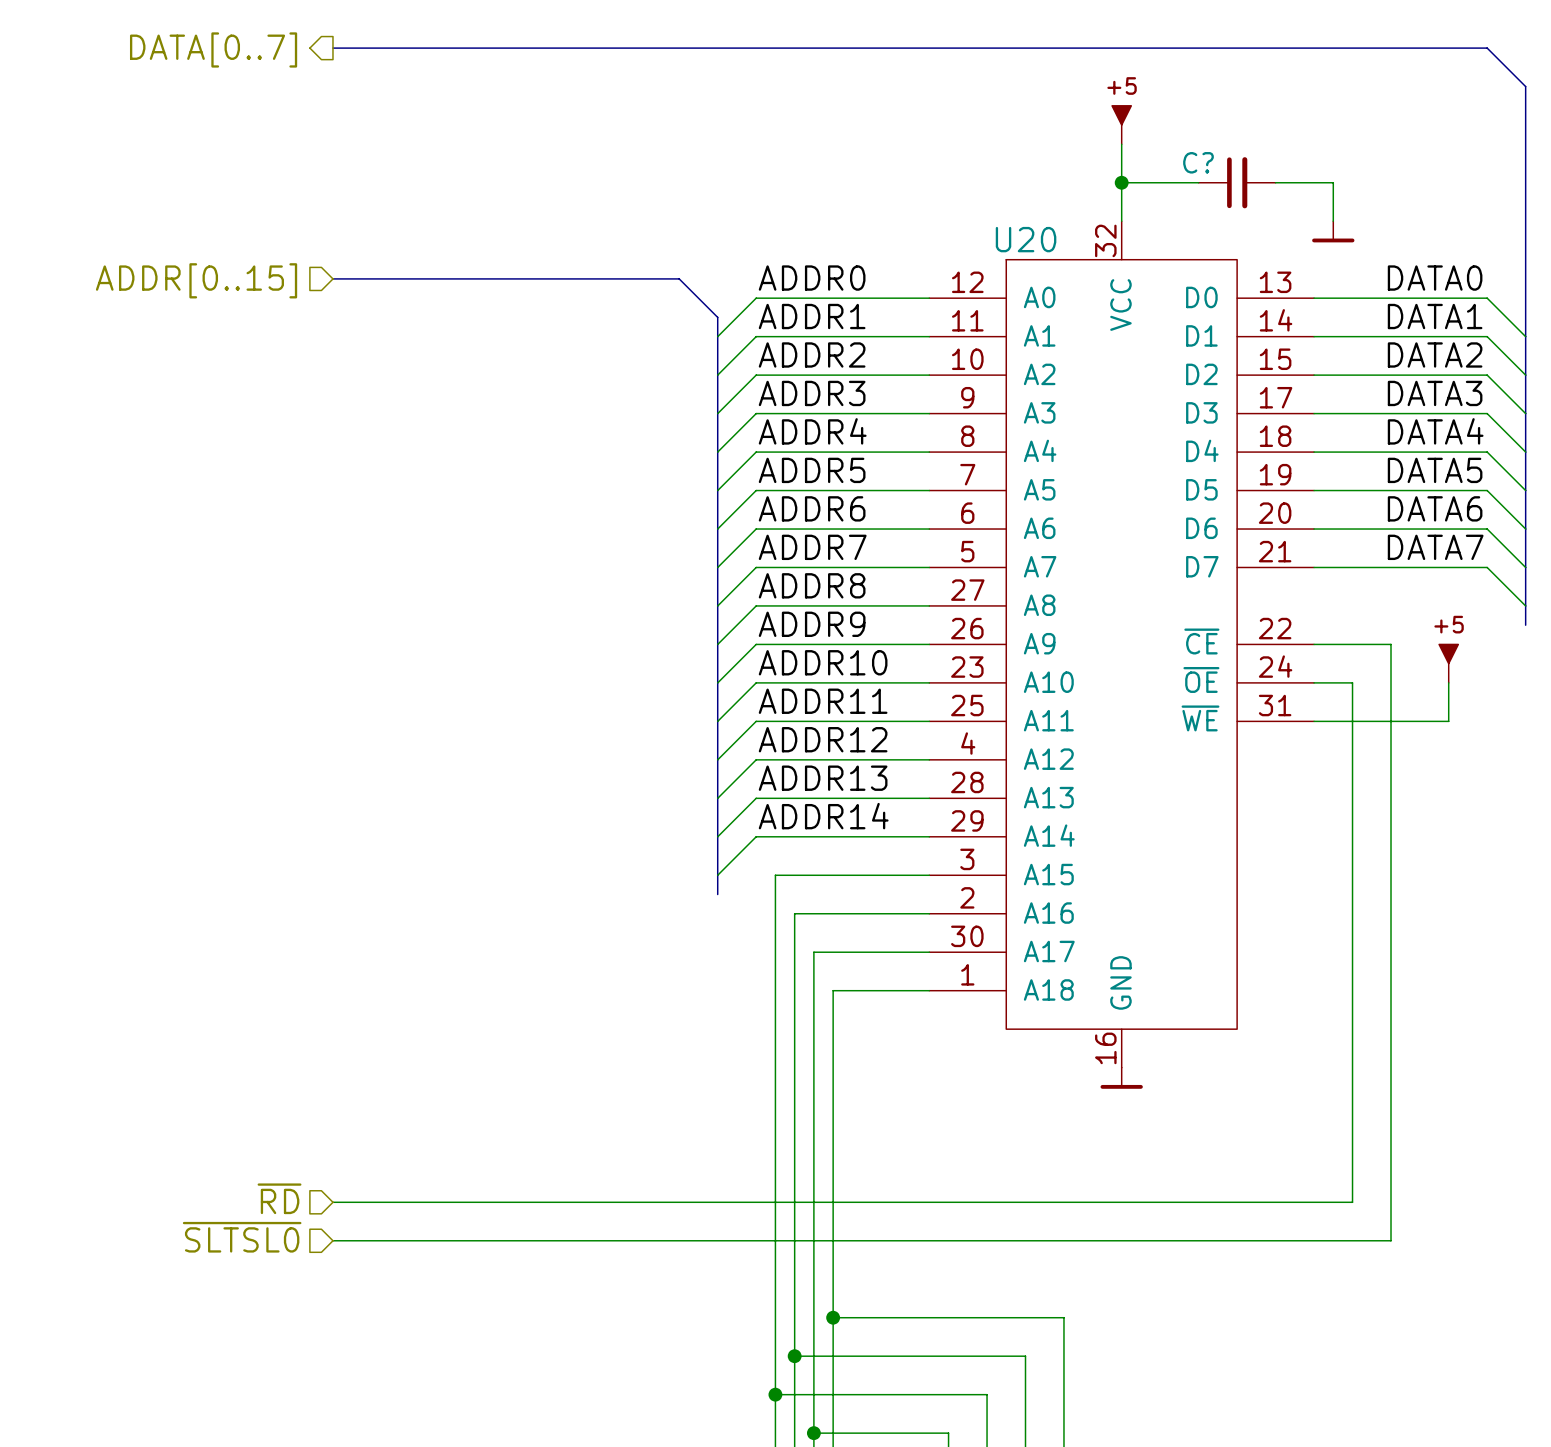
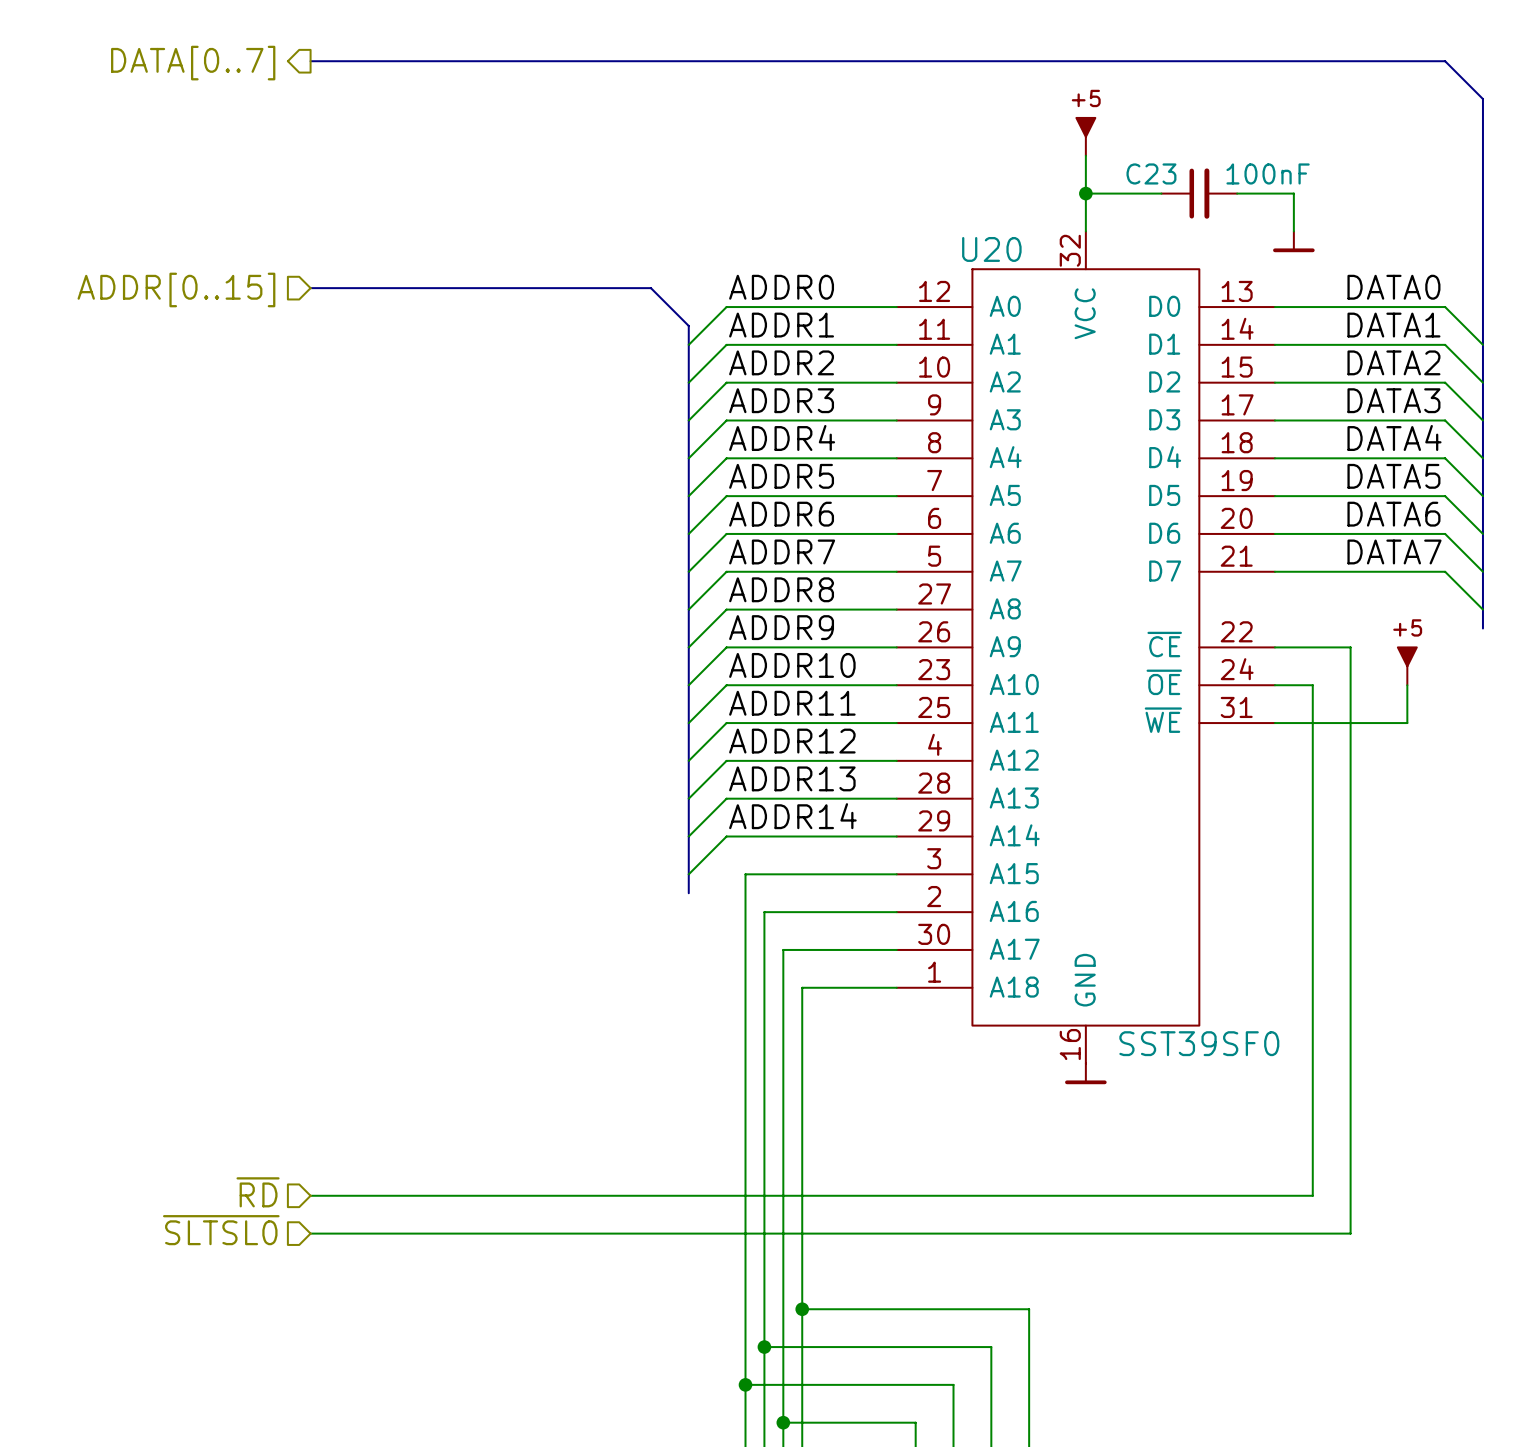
C? name: C? (1198, 162) -> C23 (1151, 173)
C? value: none -> 100nF (1268, 173)
U20 value: none -> SST39SF0 (1199, 1043)

